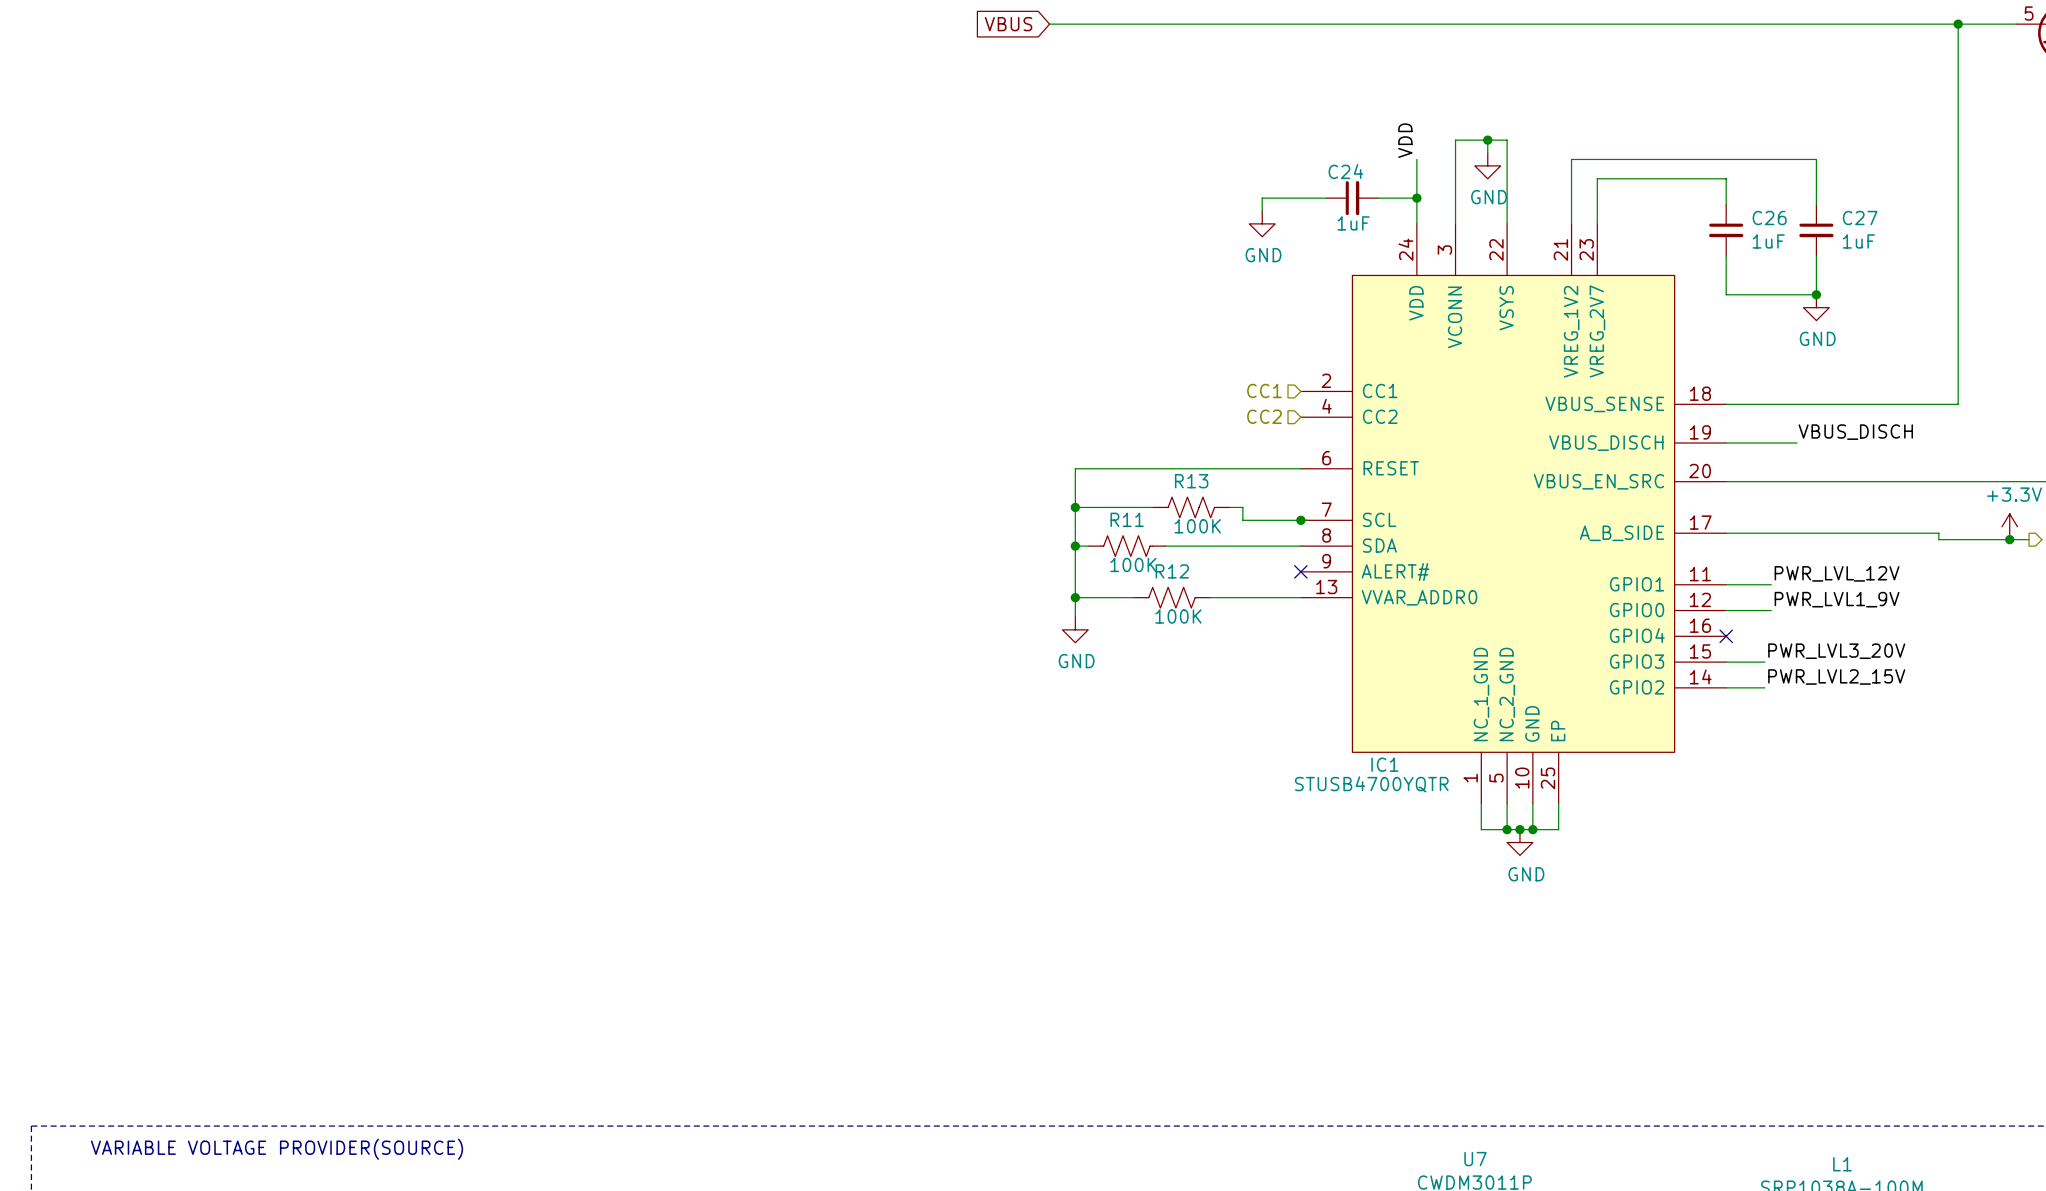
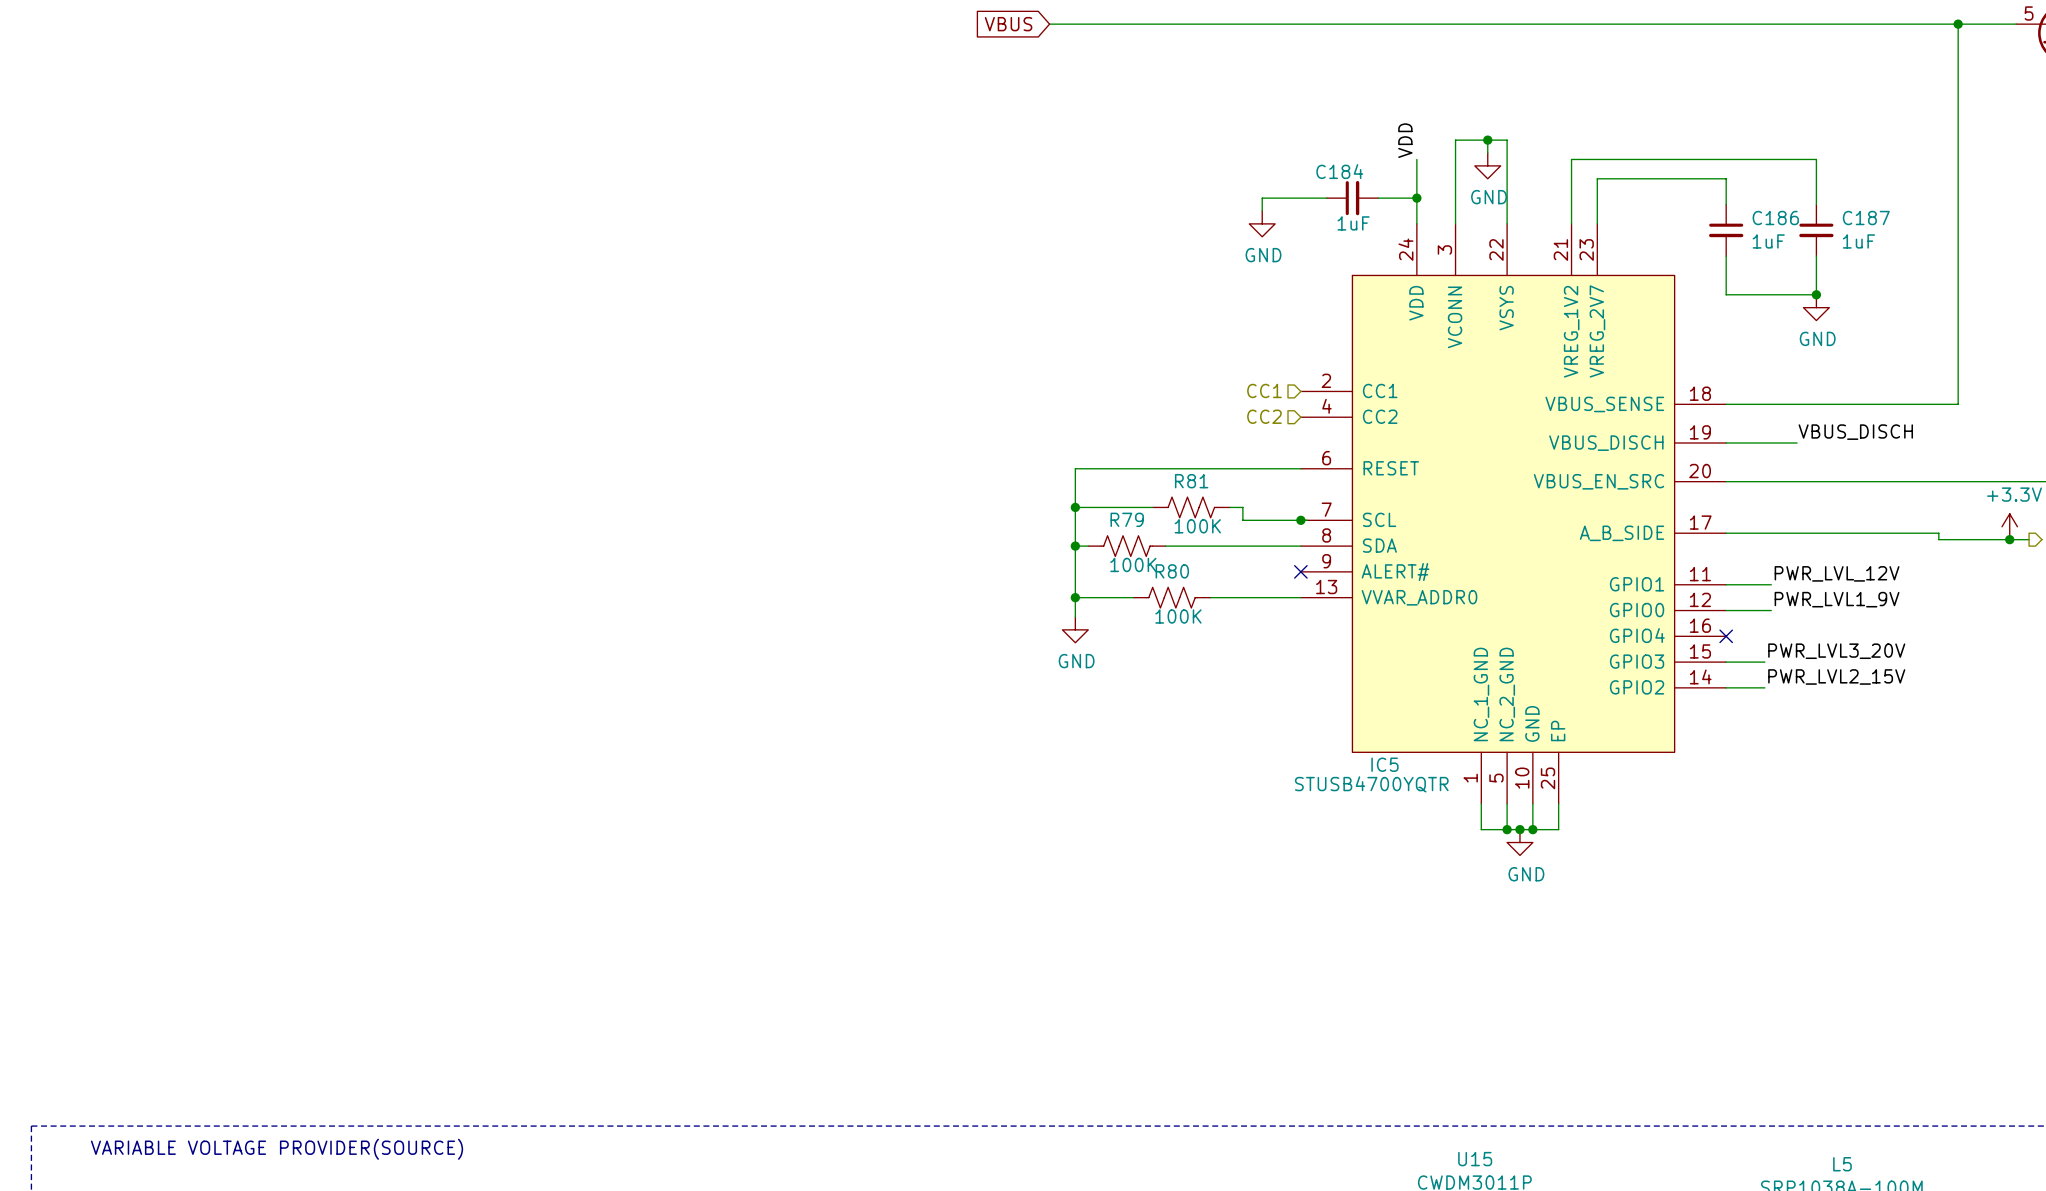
C24 name: C24 (1345, 171) -> C184 (1339, 171)
C26 name: C26 (1769, 218) -> C186 (1775, 218)
C27 name: C27 (1860, 218) -> C187 (1866, 218)
R13 name: R13 (1191, 481) -> R81 (1191, 481)
R11 name: R11 (1127, 519) -> R79 (1127, 519)
R12 name: R12 (1172, 571) -> R80 (1172, 571)
IC1 name: IC1 (1384, 764) -> IC5 (1384, 764)
U7 name: U7 (1475, 1159) -> U15 (1475, 1159)
L1 name: L1 (1842, 1164) -> L5 (1842, 1164)

